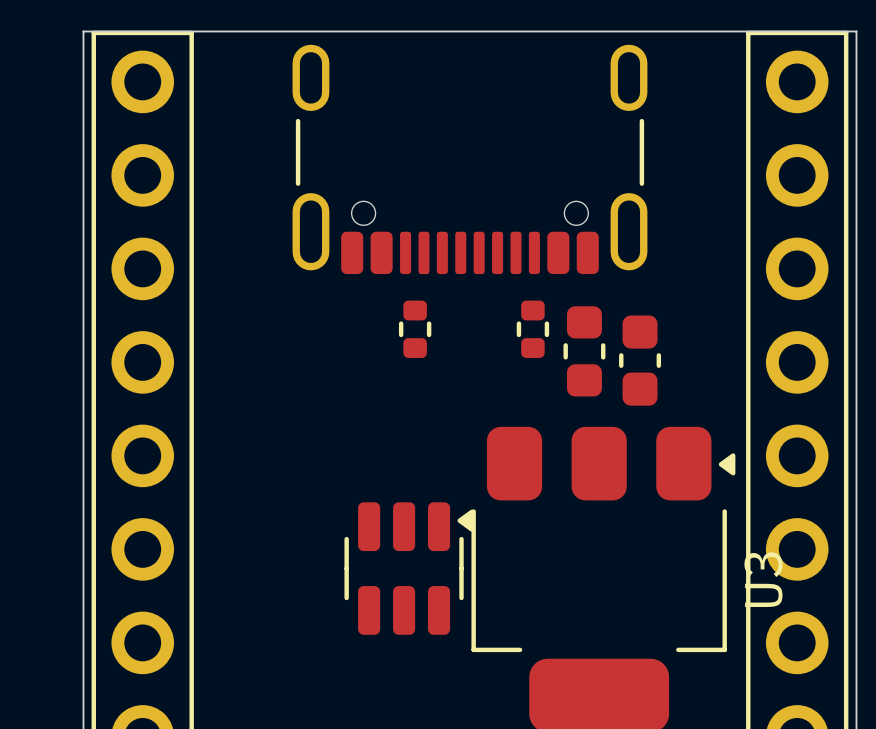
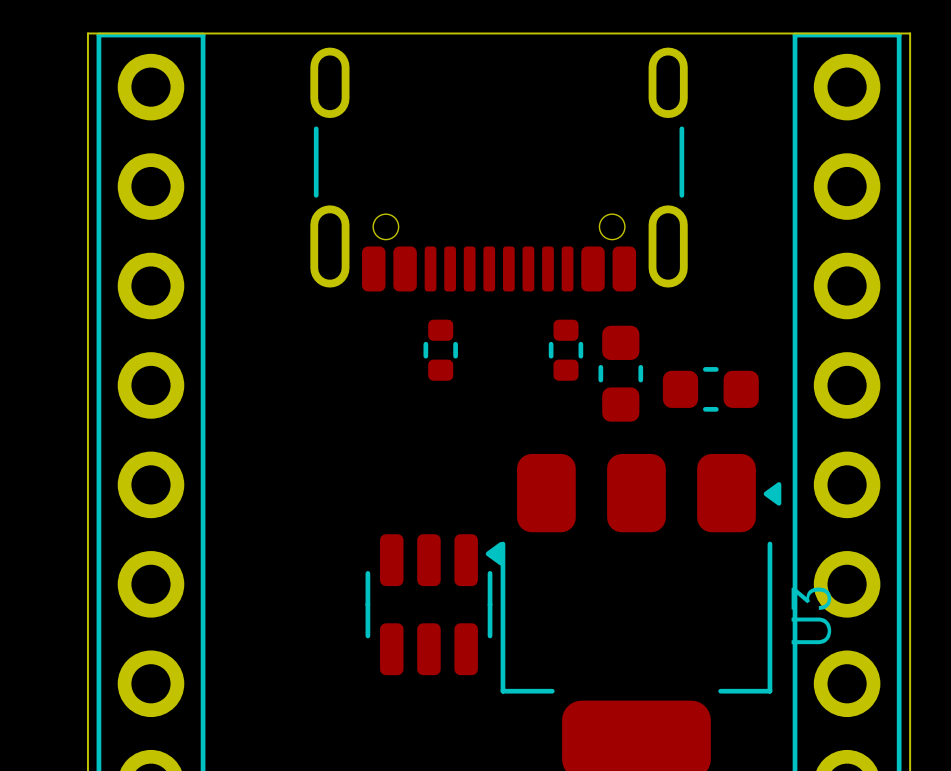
part rotation: 0° (640, 360) -> 90° clockwise (710, 389)

